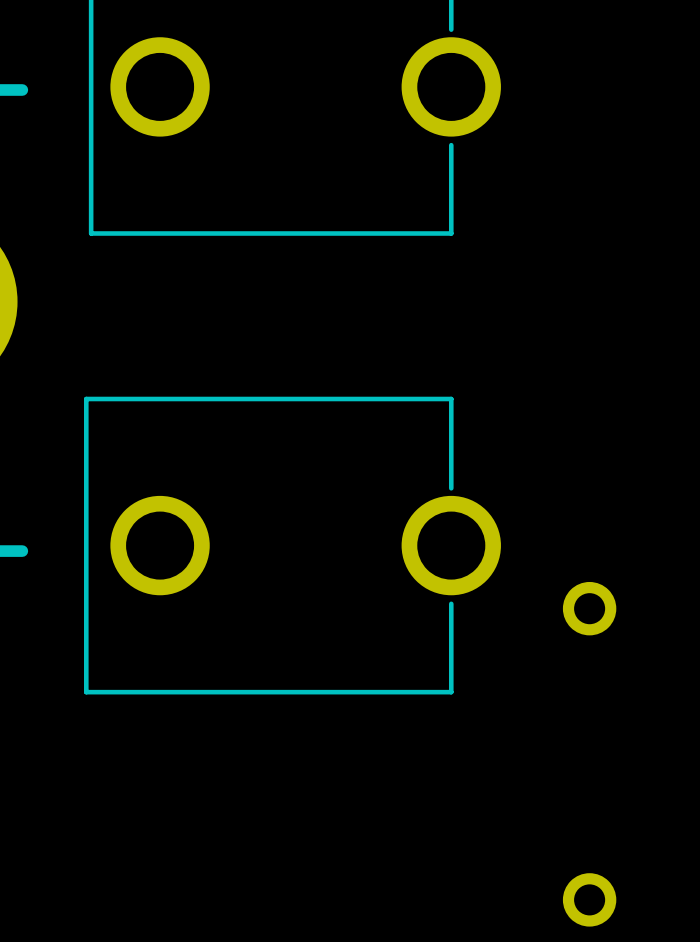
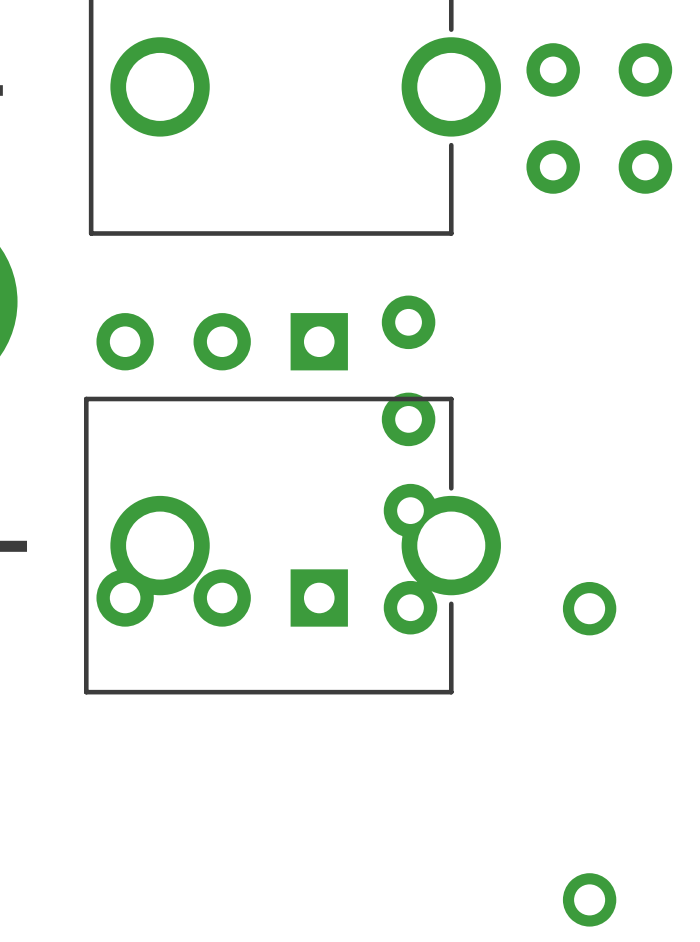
part: none -> (553, 118)
part: none -> (645, 118)
part: none -> (222, 341)
part: none -> (408, 370)
part: none -> (410, 559)
part: none -> (222, 598)

